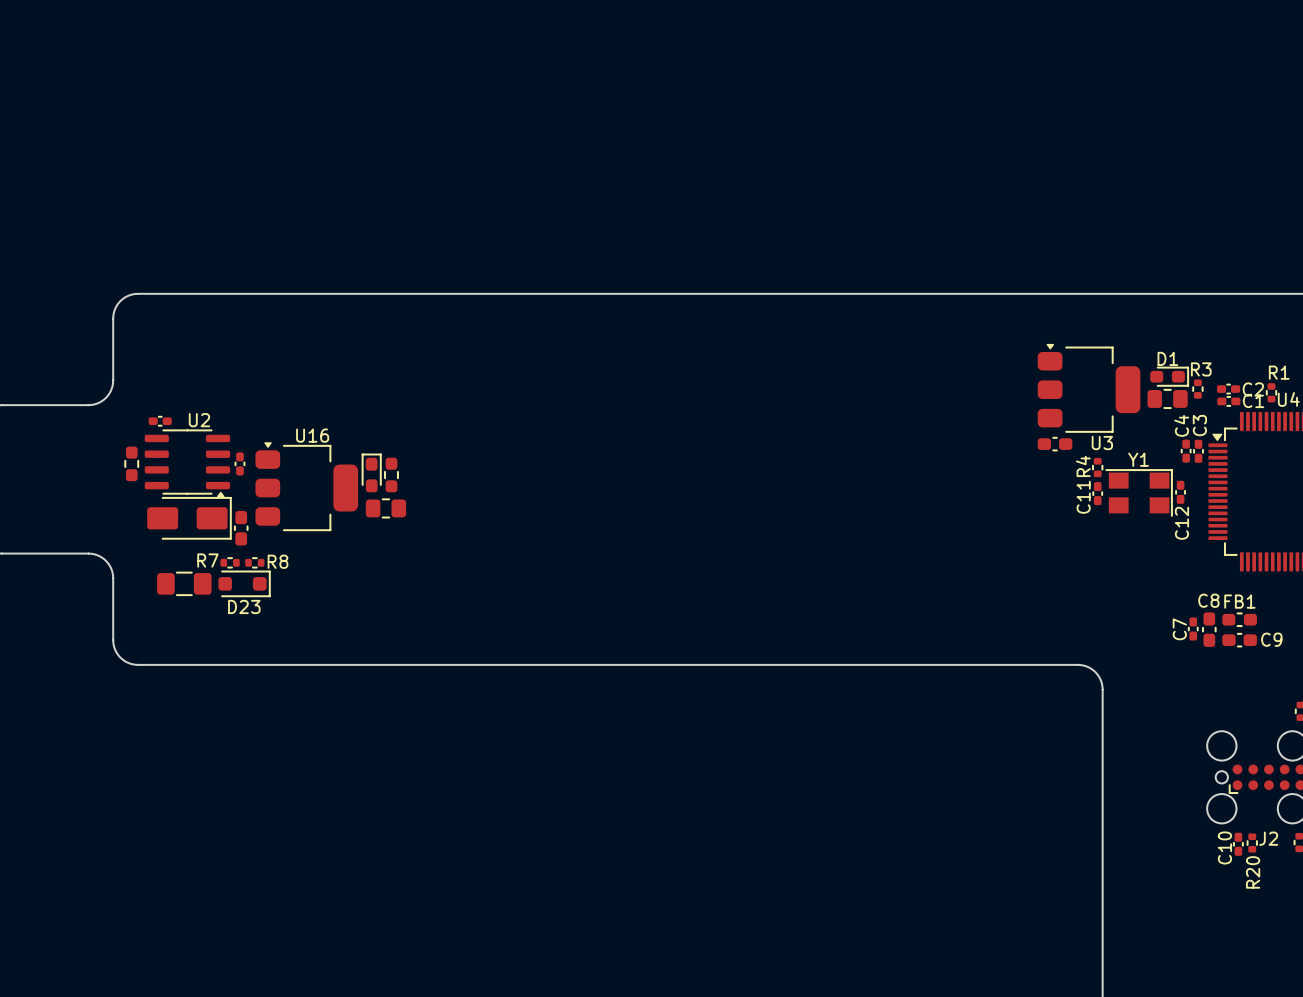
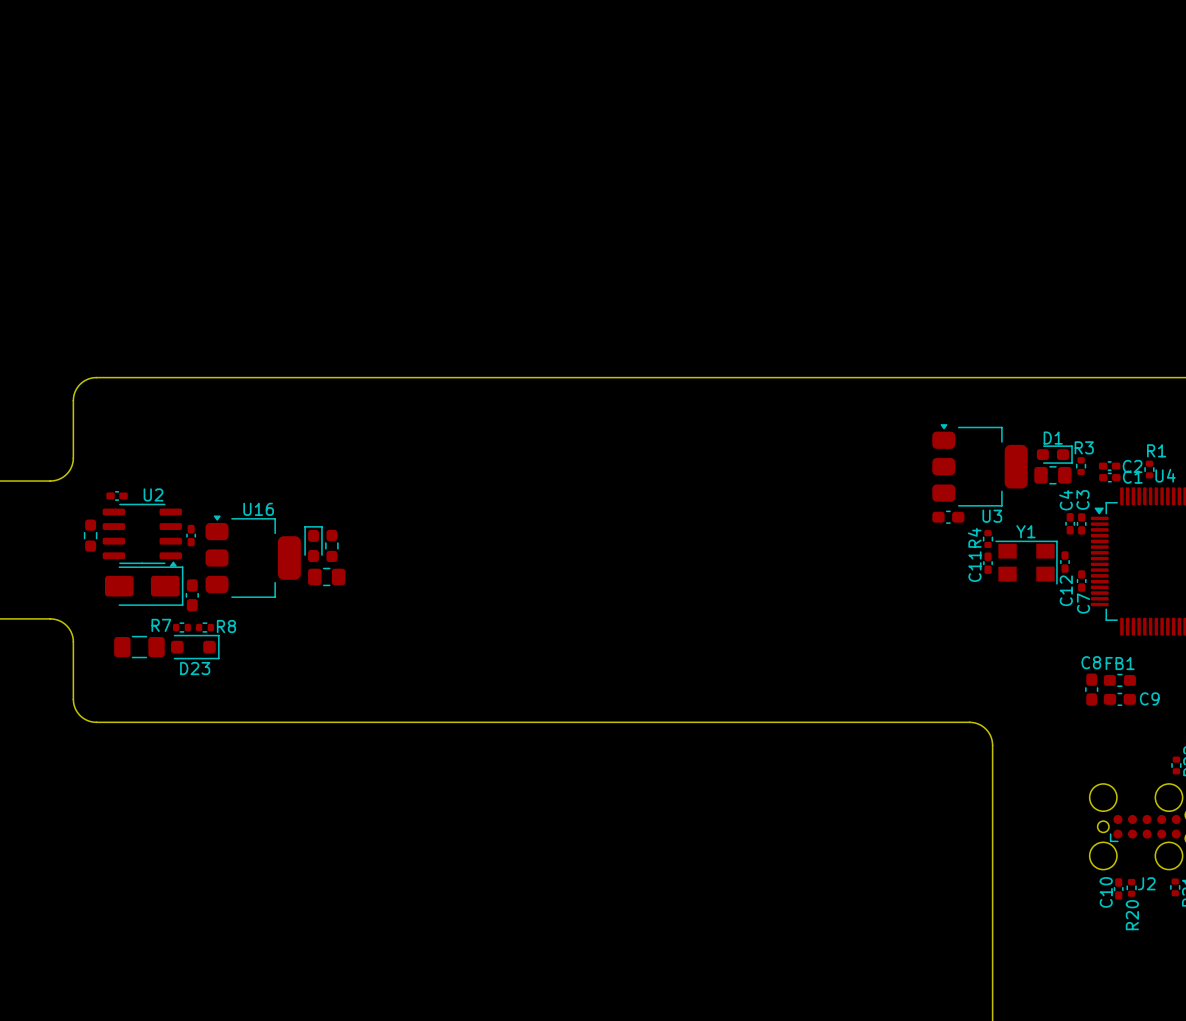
C7 name position: C7 (1179, 629) -> C7 (1083, 603)
C7 position: (1193, 629) -> (1081, 580)

